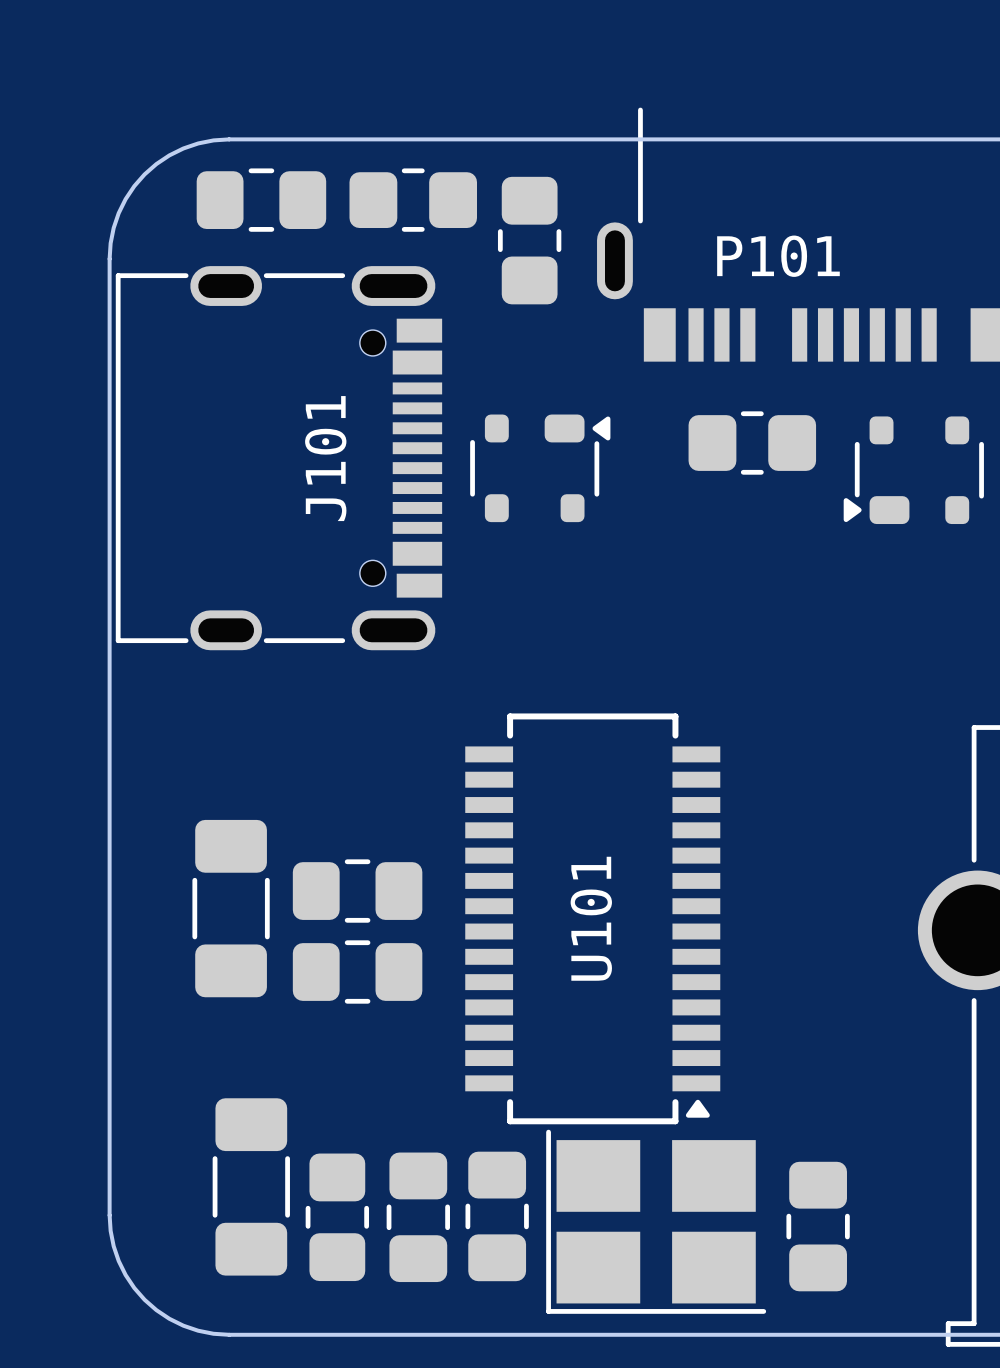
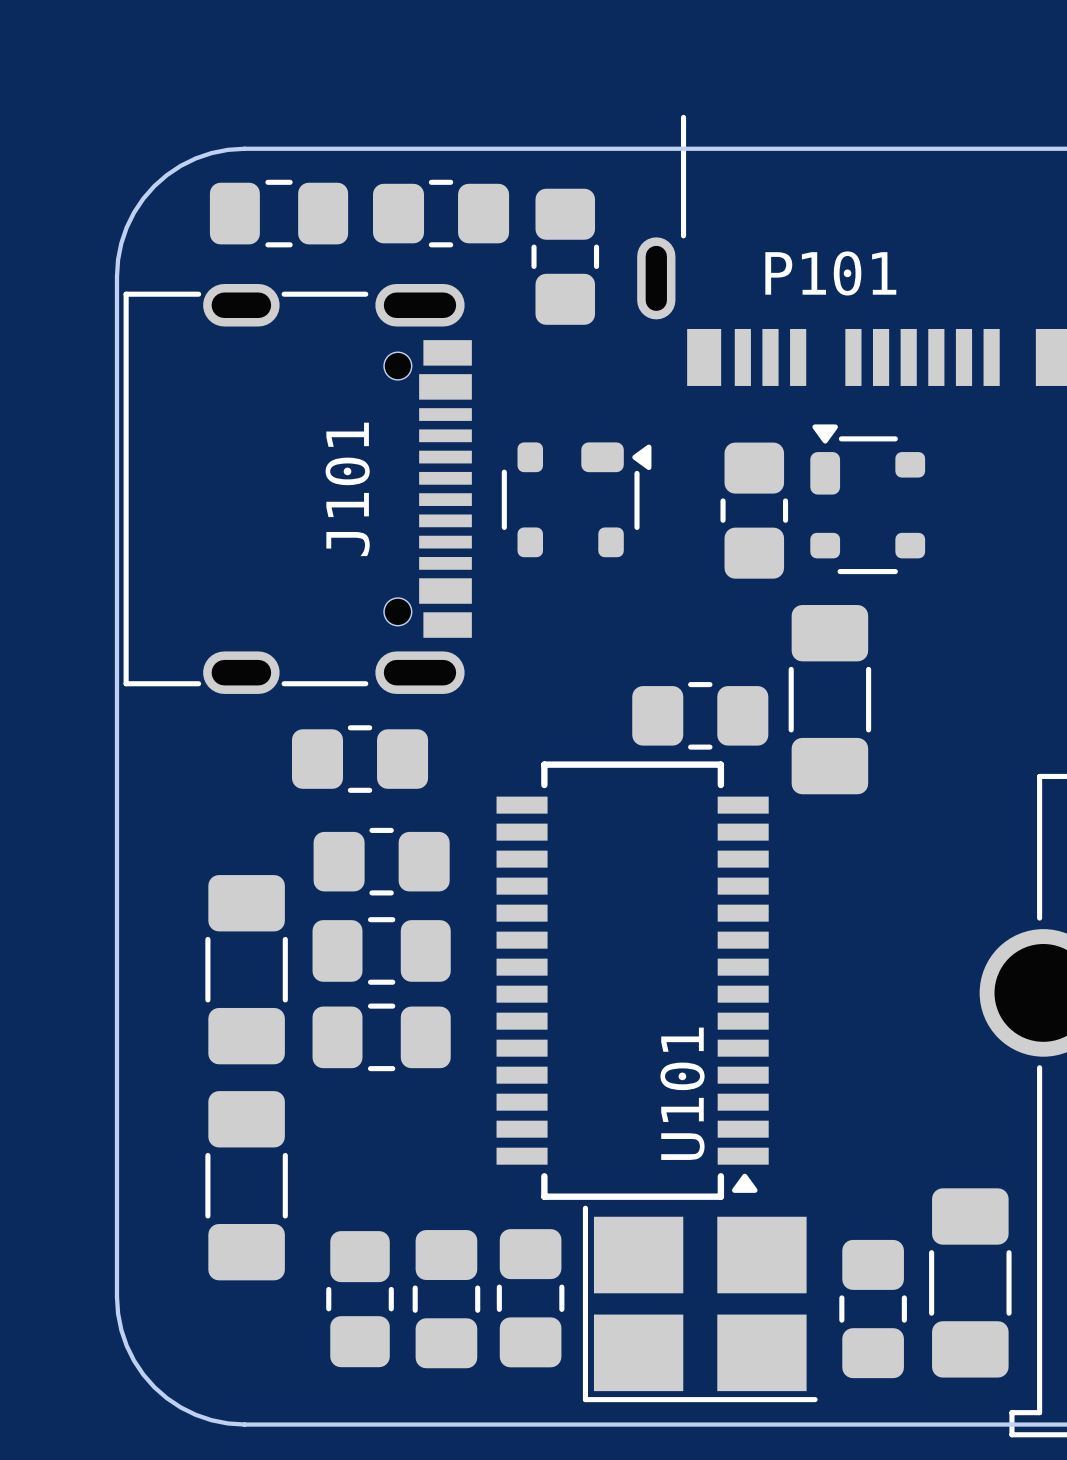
part rotation: 0° (752, 443) -> 90° clockwise (754, 510)
part rotation: 0° (913, 470) -> 90° clockwise (867, 499)
part position: (913, 470) -> (867, 499)
part: none -> (829, 699)
part: none -> (700, 715)
part: none -> (360, 759)
part: none -> (381, 861)
U101 name position: U101 (591, 918) -> U101 (682, 1093)
part position: (251, 1186) -> (246, 1185)
part: none -> (970, 1282)

